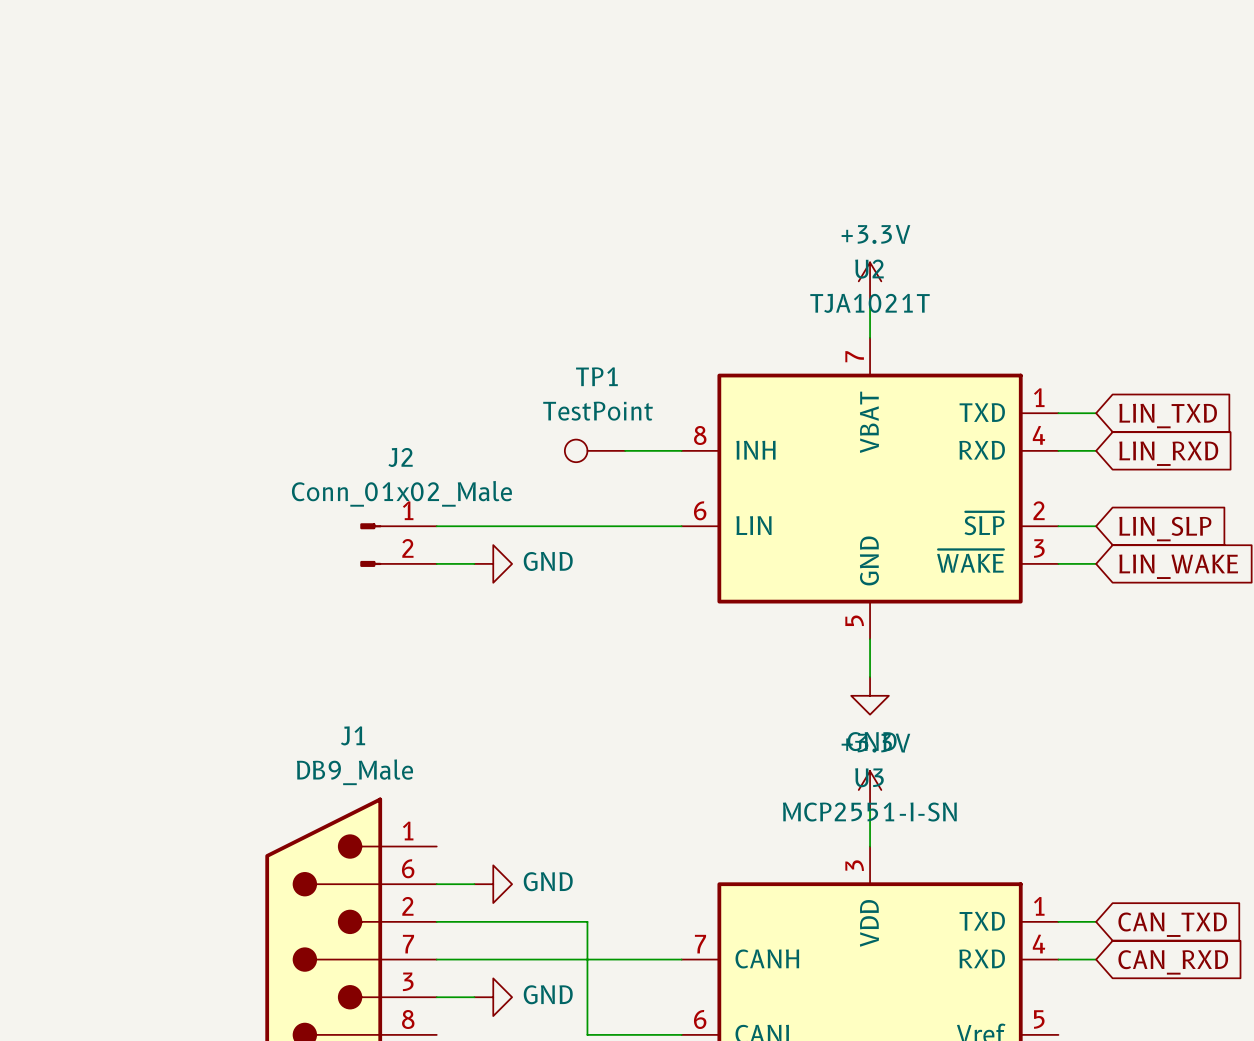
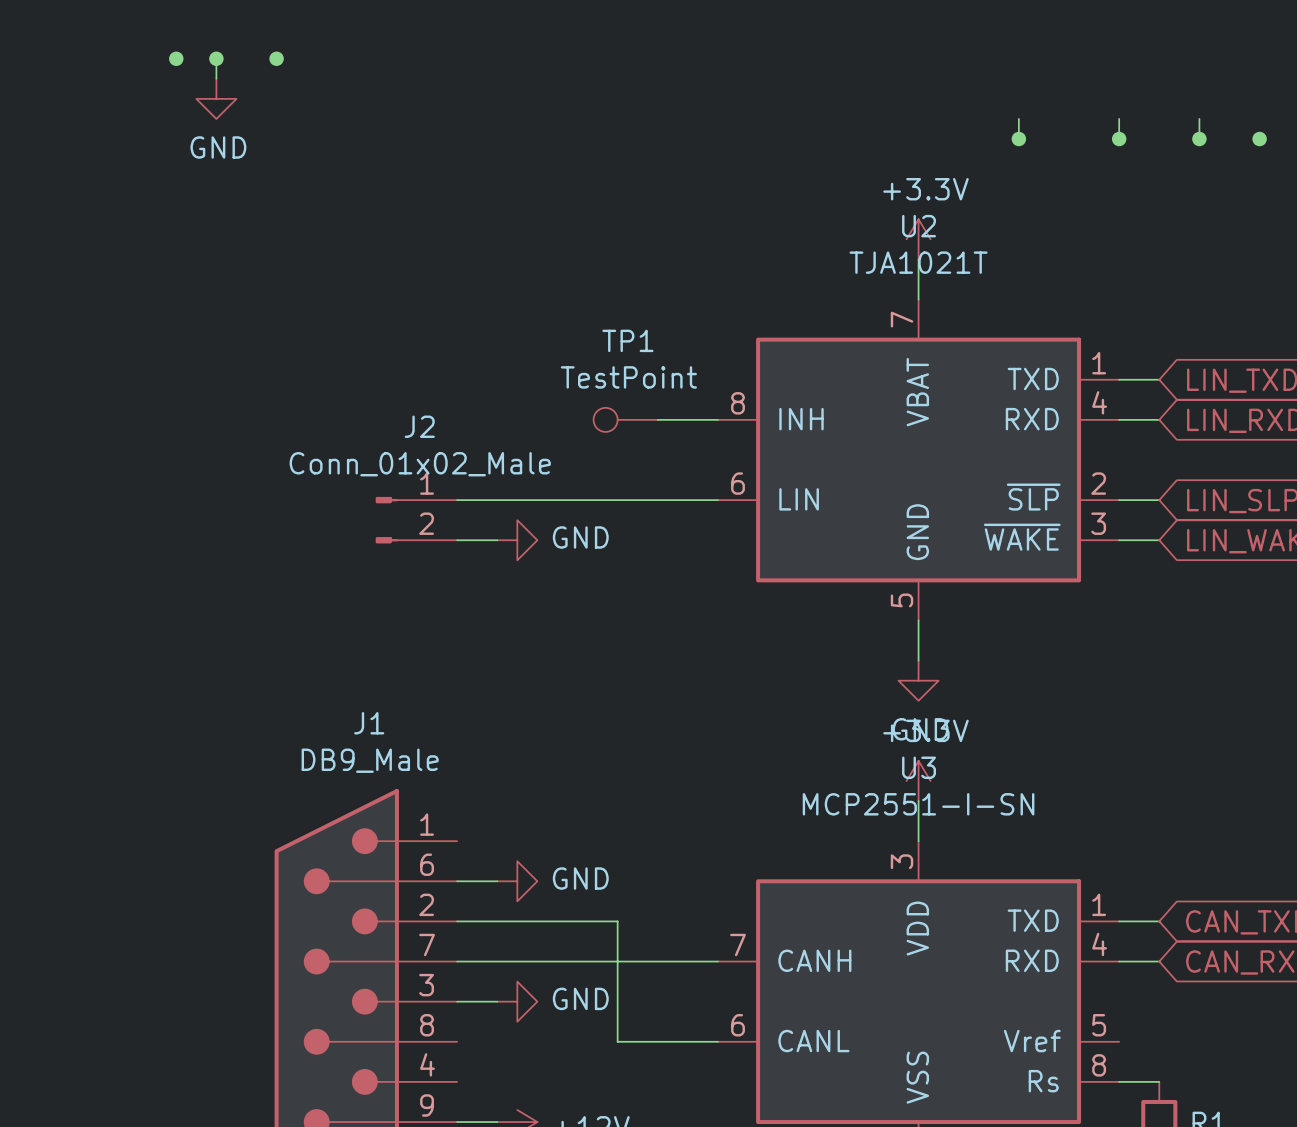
junction: none -> (176, 58)
wire: none -> (216, 58) (216, 78)
junction: none -> (216, 58)
junction: none -> (276, 58)
power symbol: none -> GND (216, 98)
wire: none -> (1018, 118) (1018, 139)
wire: none -> (1119, 118) (1119, 139)
wire: none -> (1199, 118) (1199, 139)
junction: none -> (1018, 139)
junction: none -> (1119, 139)
junction: none -> (1199, 139)
junction: none -> (1259, 139)

